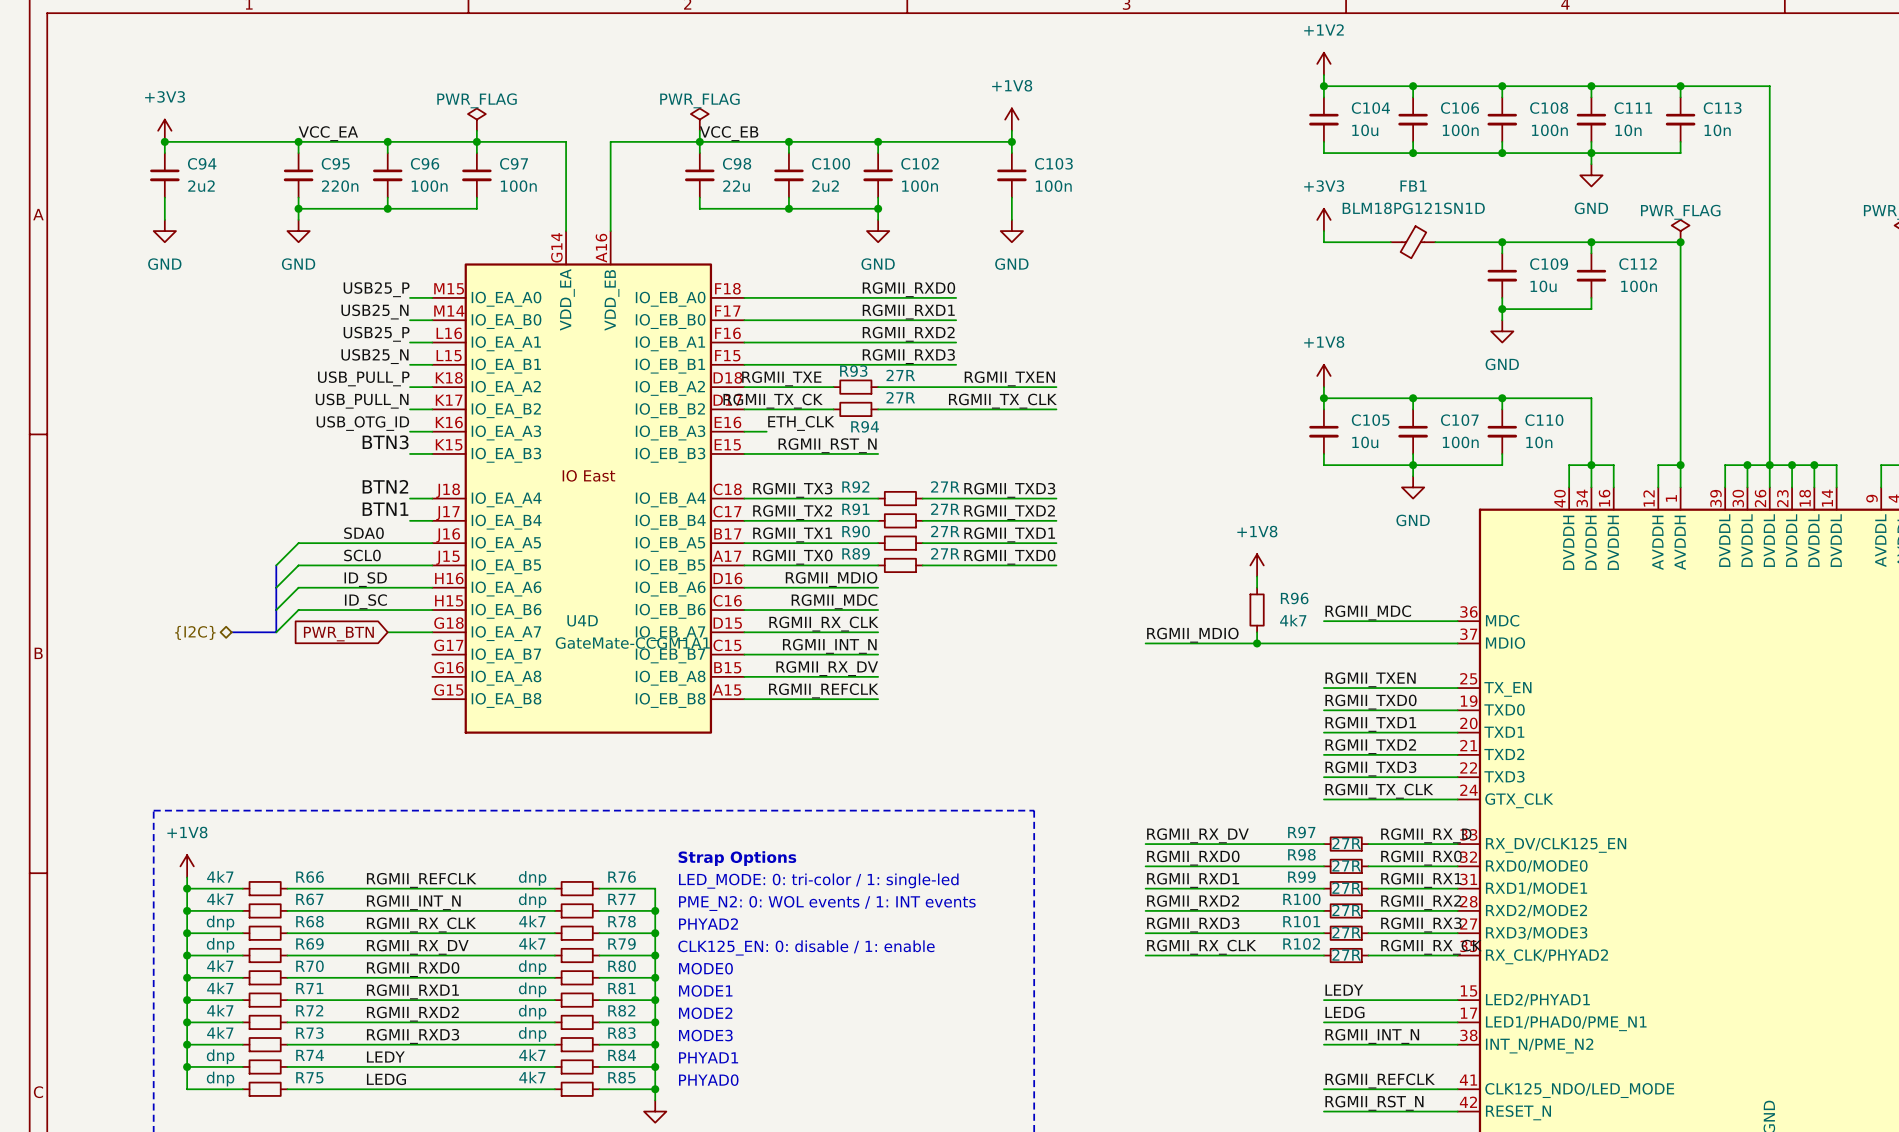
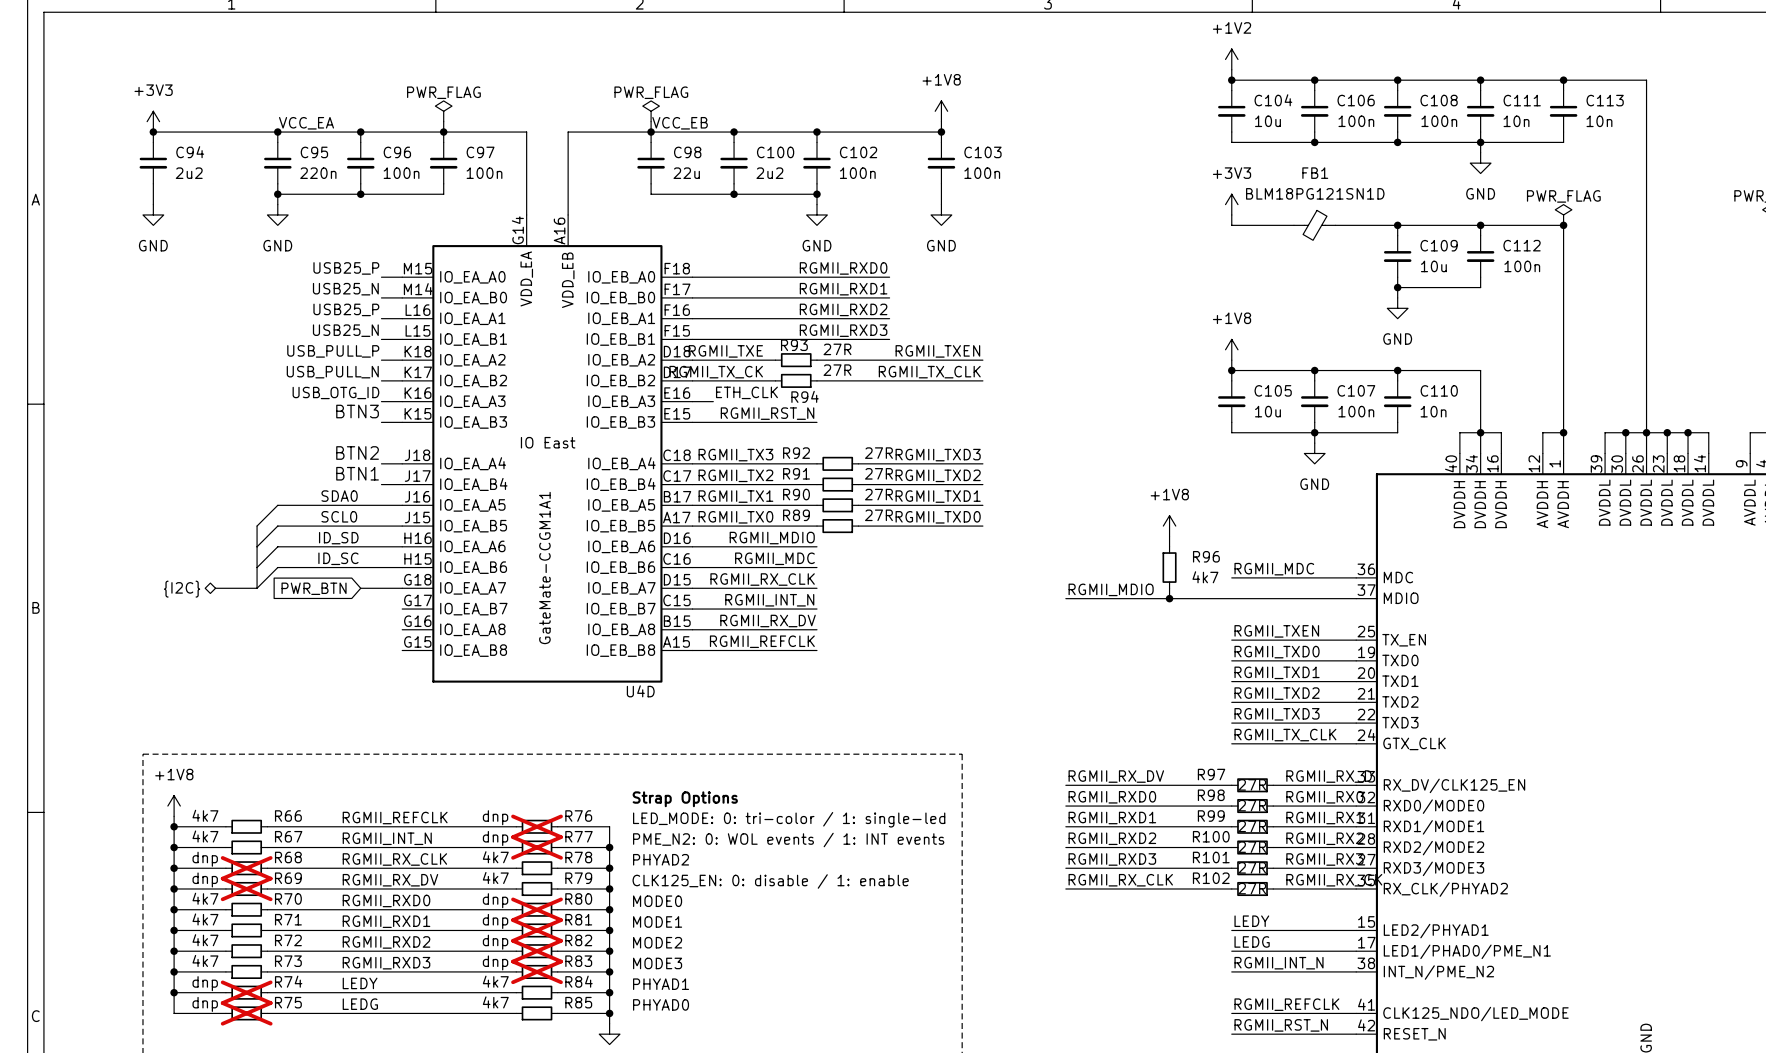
U4D name position: U4D (582, 620) -> U4D (640, 691)
U4D value rotation: 0° (632, 643) -> 90° counterclockwise (544, 568)
R76 do-not-place cross: none -> (537, 826)
R77 do-not-place cross: none -> (537, 847)
R68 do-not-place cross: none -> (246, 868)
R69 do-not-place cross: none -> (246, 888)
R80 do-not-place cross: none -> (537, 909)
R81 do-not-place cross: none -> (537, 930)
R82 do-not-place cross: none -> (537, 951)
R83 do-not-place cross: none -> (537, 971)
R74 do-not-place cross: none -> (246, 992)
R75 do-not-place cross: none -> (246, 1013)

